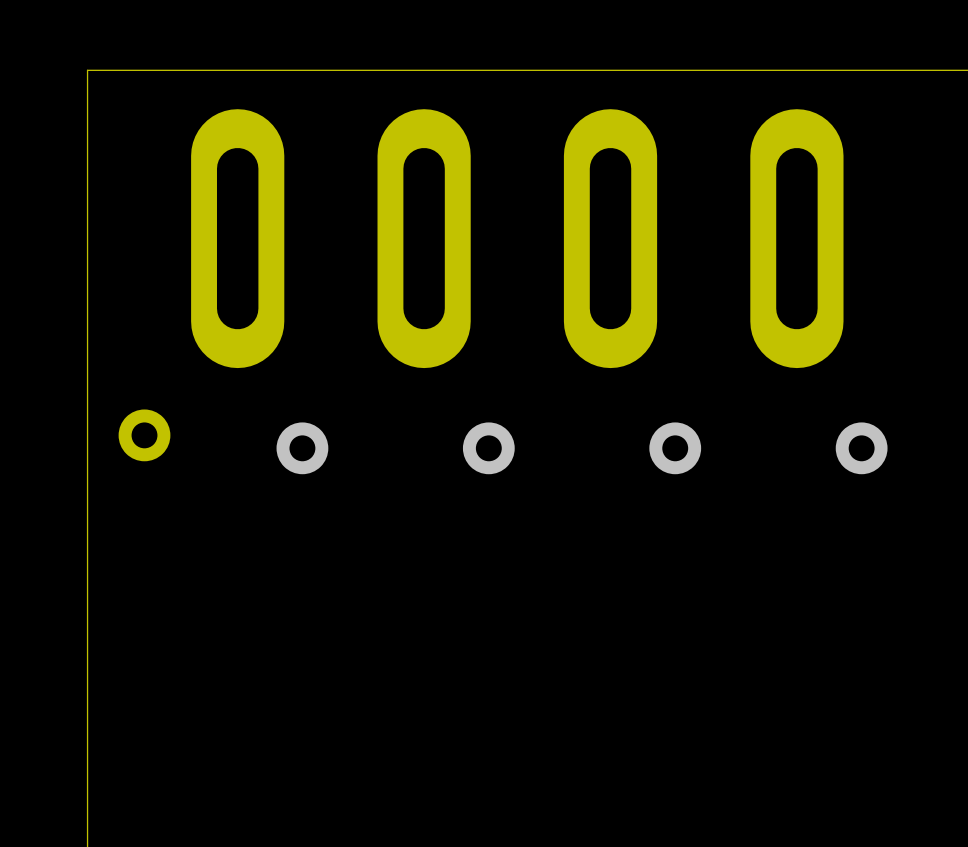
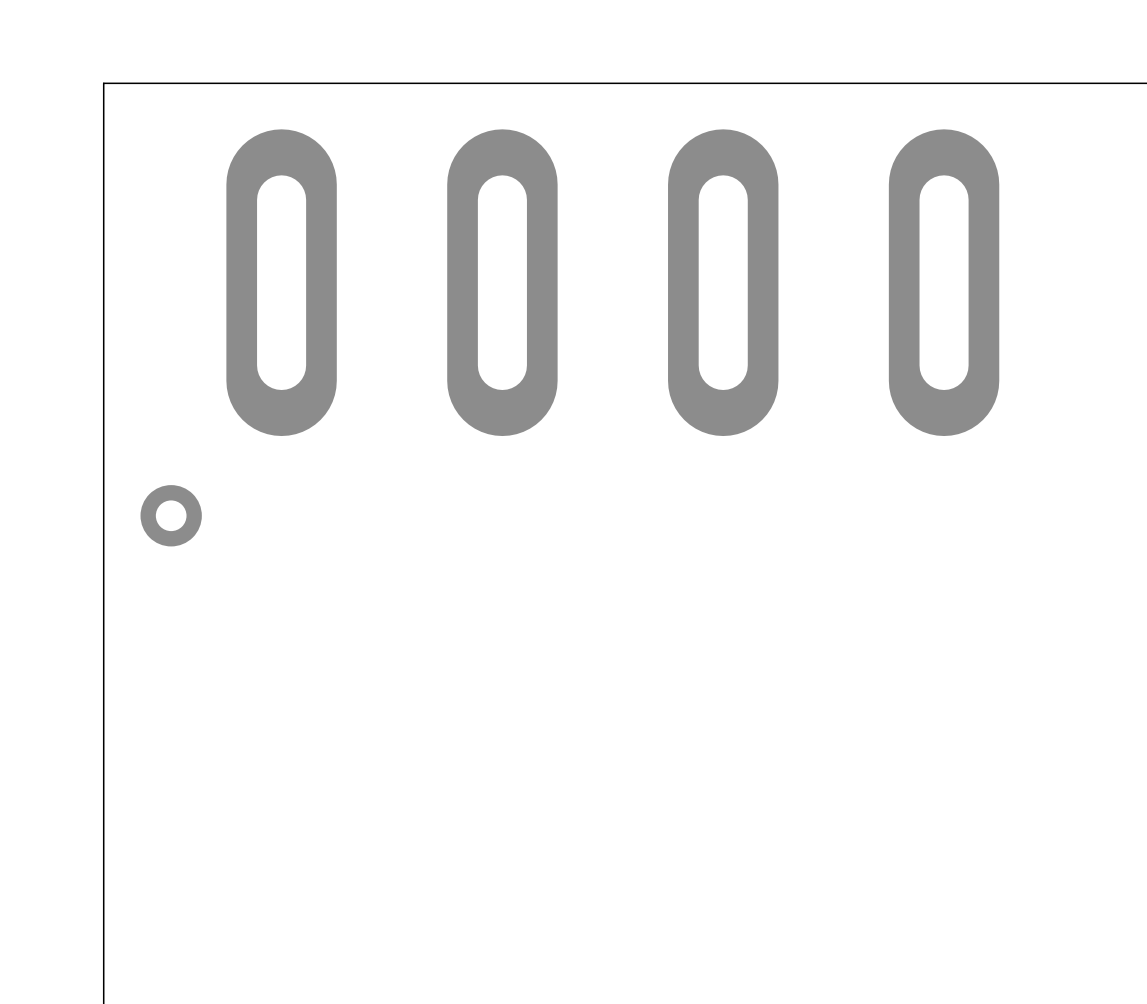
via: (302, 448) -> none
via: (488, 448) -> none
via: (675, 448) -> none
via: (861, 448) -> none

